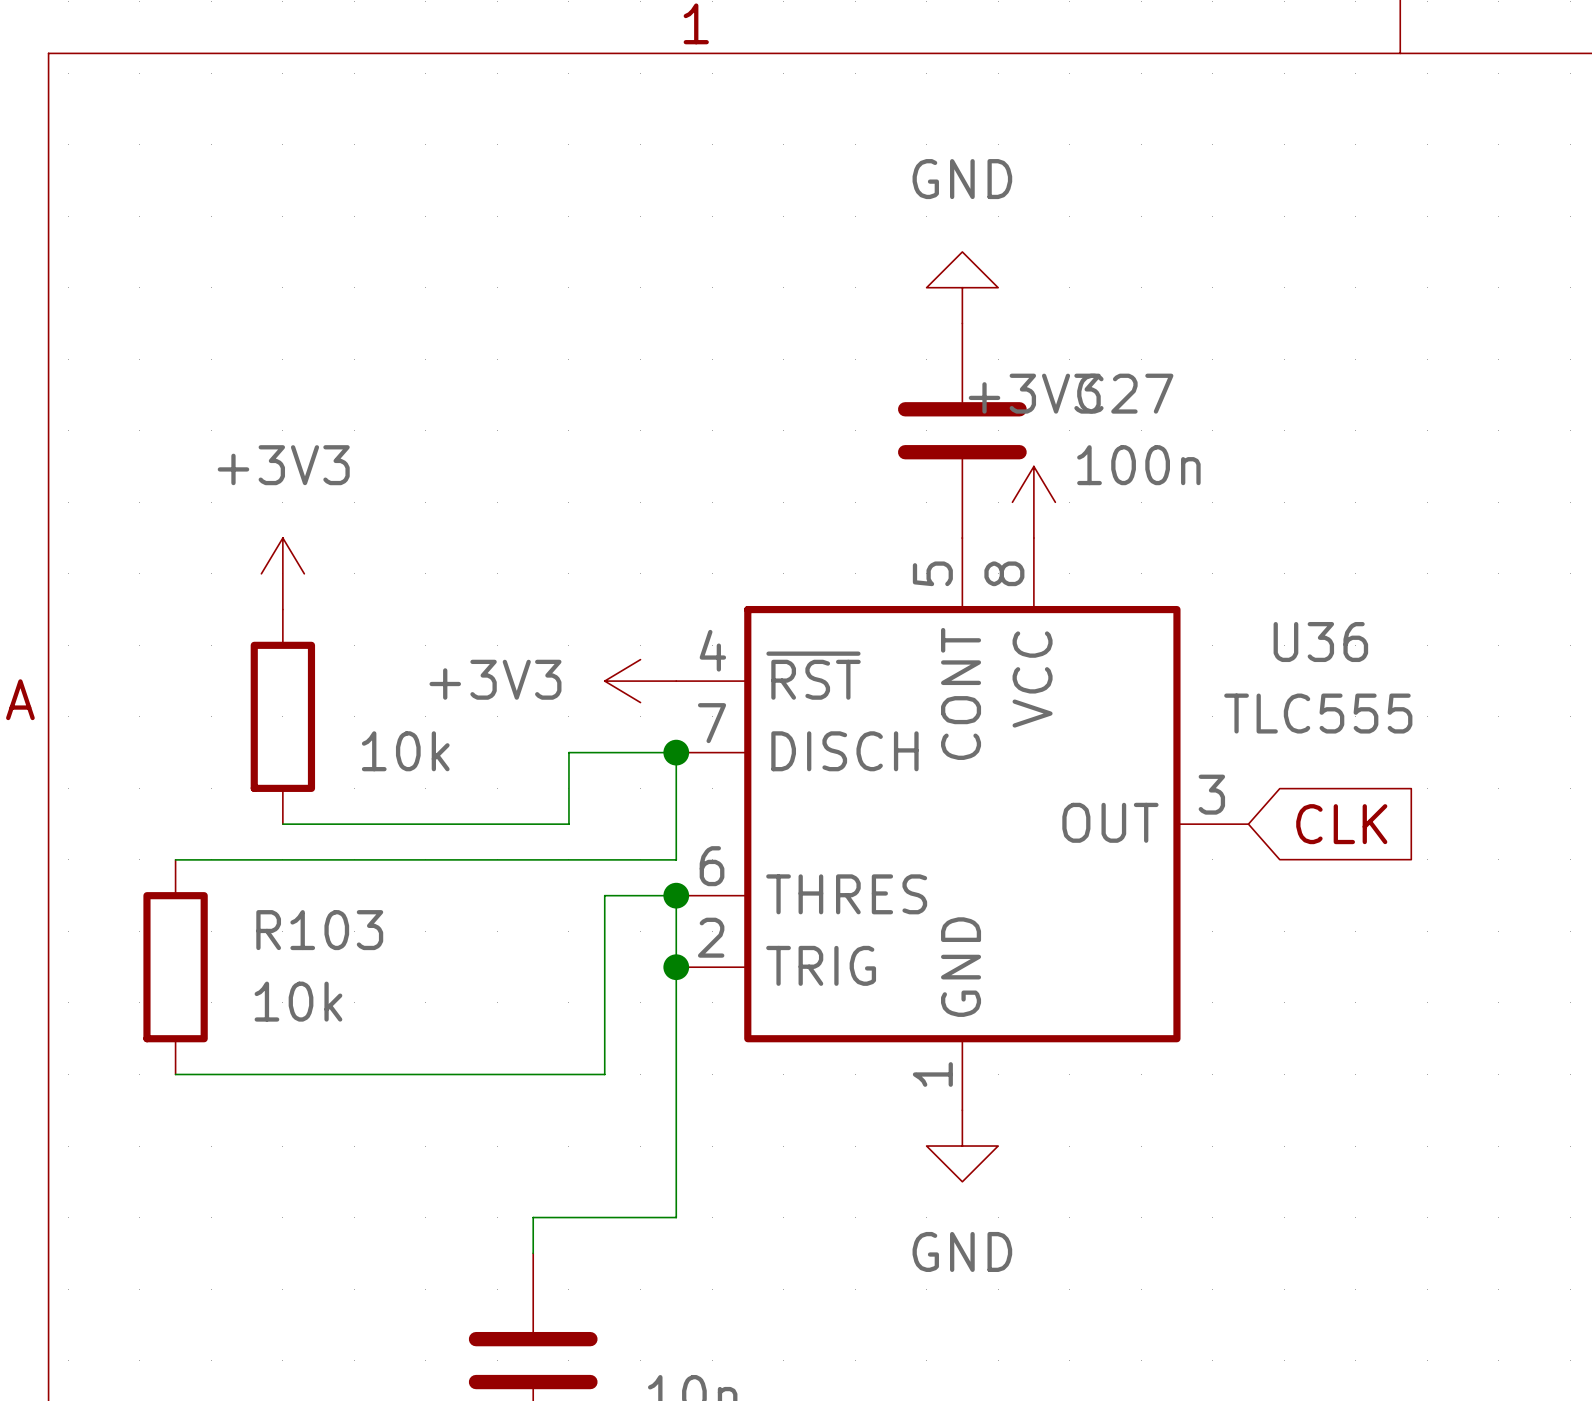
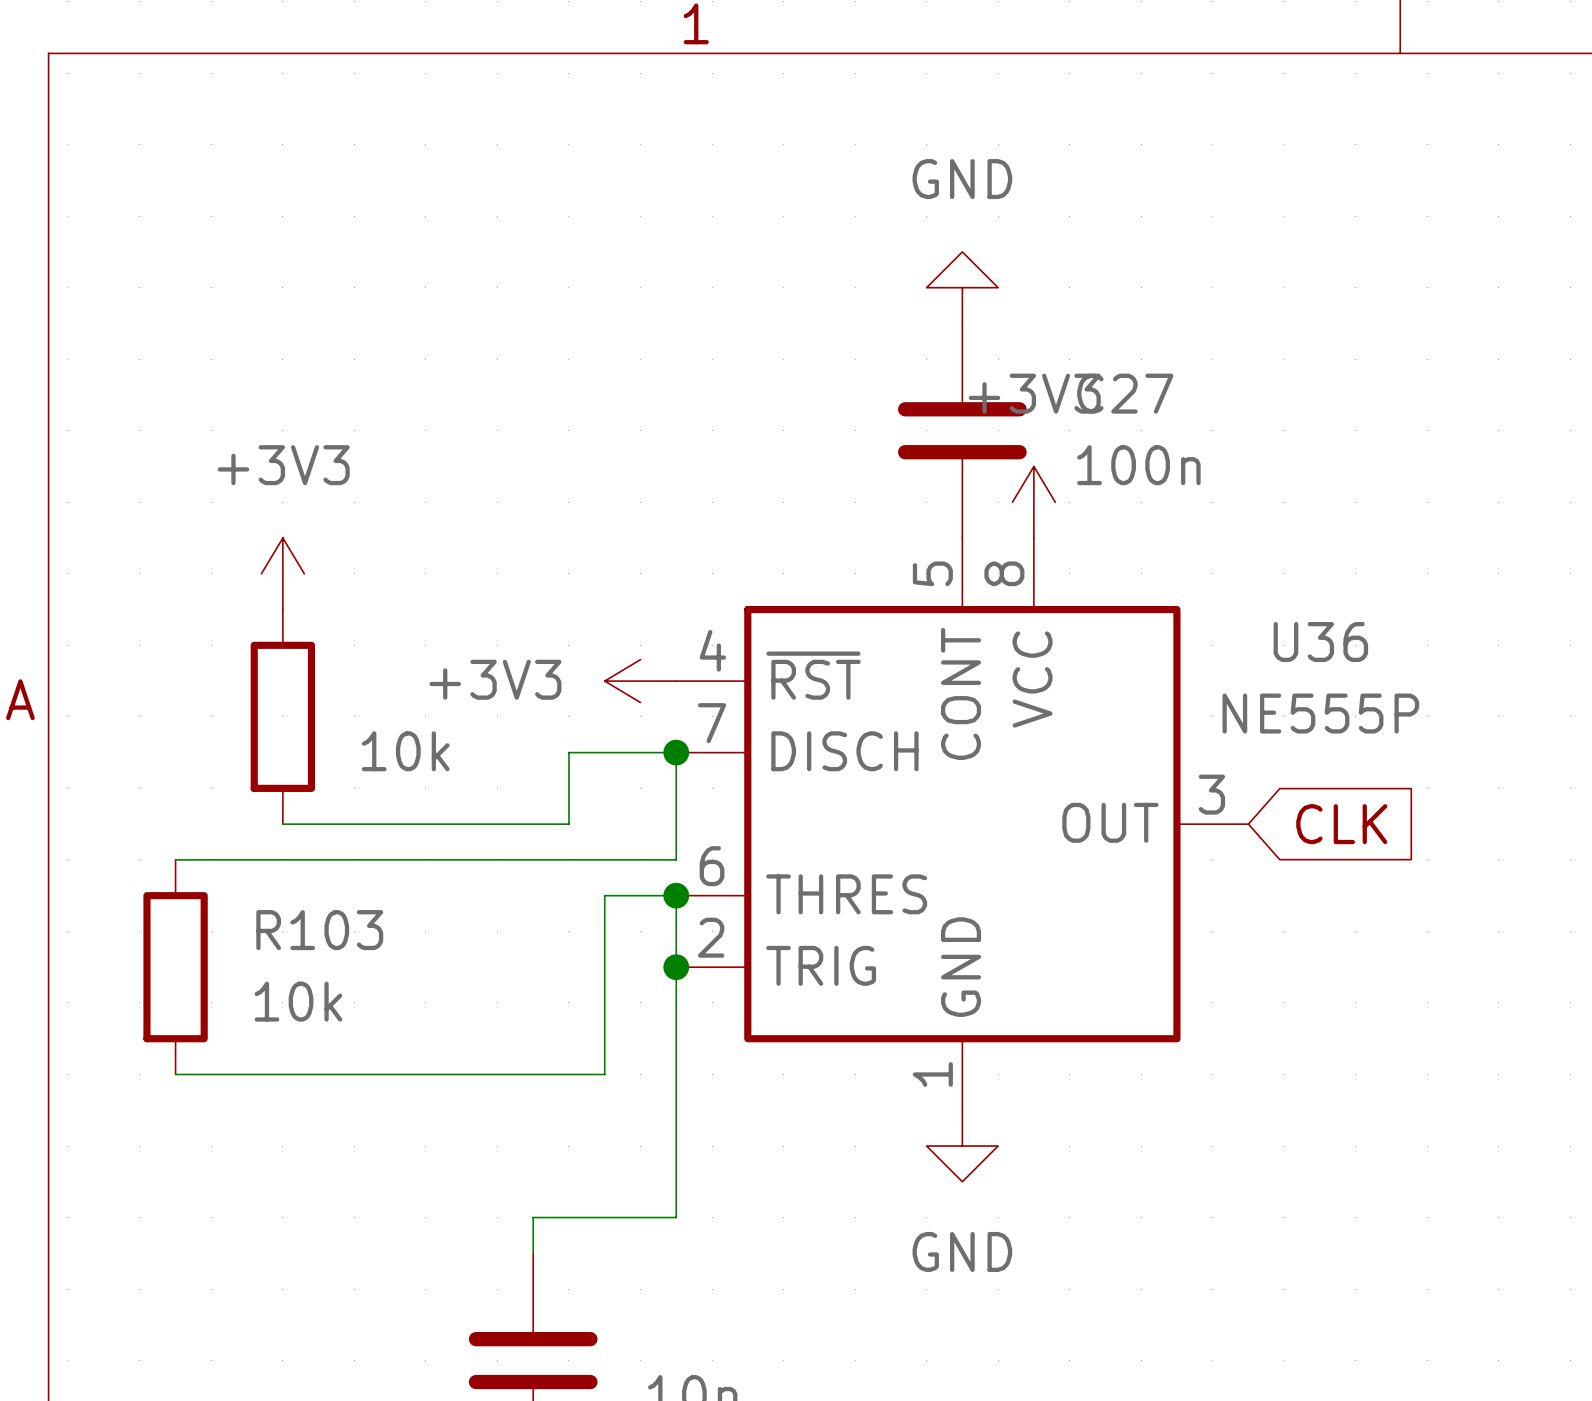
U36 value: TLC555 (1318, 713) -> NE555P (1320, 713)

